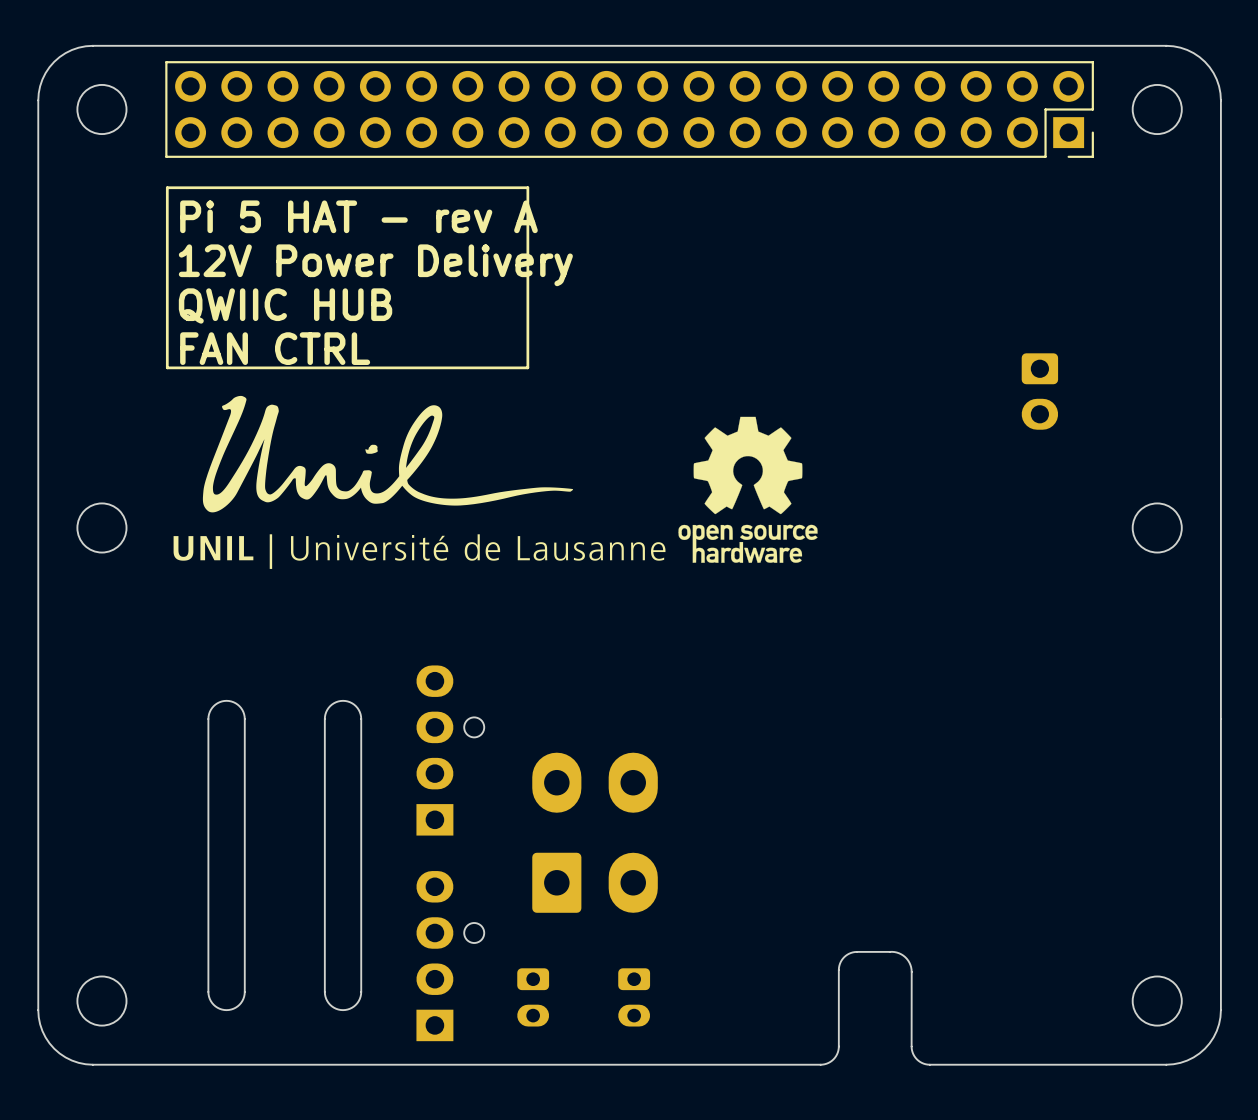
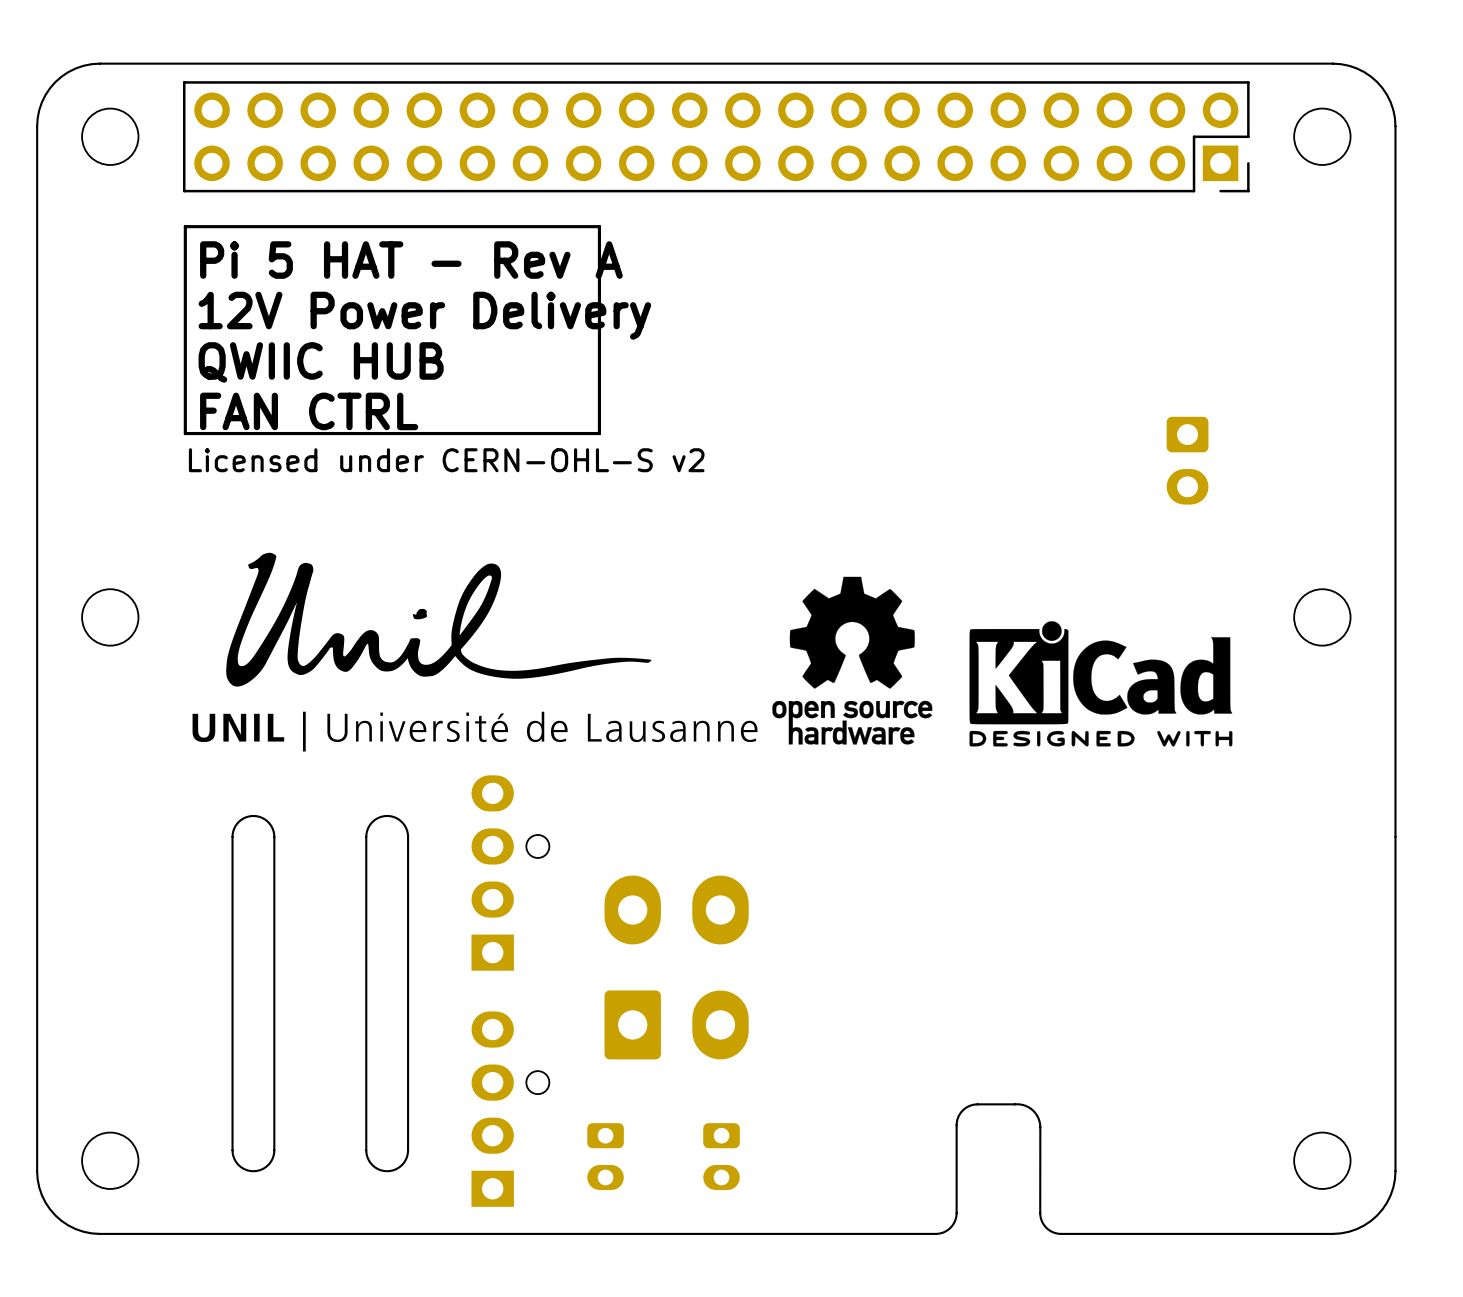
text: Pi 5 HAT - rev A (358, 216) -> Pi 5 HAT - Rev A (411, 260)
text: none -> Licensed under CERN-OHL-S v2 (446, 460)
drawing position: (371, 449) -> (419, 614)
drawing position: (387, 454) -> (438, 619)
drawing position: (748, 489) -> (852, 660)
drawing: none -> [969, 621, 1233, 747]
drawing: [337, 534, 340, 561] -> none
drawing: [412, 534, 449, 561] -> none
drawing position: (441, 538) -> (500, 716)
drawing: [362, 542, 378, 561] -> none
drawing: [485, 542, 501, 561] -> none
drawing: [533, 542, 548, 561] -> none
drawing: [589, 542, 604, 561] -> none
drawing position: (472, 547) -> (535, 726)
drawing position: (183, 548) -> (203, 727)
drawing position: (210, 548) -> (234, 727)
drawing position: (229, 548) -> (256, 727)
drawing position: (246, 548) -> (275, 727)
drawing position: (299, 548) -> (337, 727)
drawing position: (523, 548) -> (594, 727)
drawing position: (424, 549) -> (480, 728)
drawing position: (270, 551) -> (304, 731)
drawing position: (322, 551) -> (363, 731)
drawing position: (351, 551) -> (397, 731)
drawing position: (387, 551) -> (437, 731)
drawing position: (400, 551) -> (453, 731)
drawing position: (561, 551) -> (637, 731)
drawing position: (579, 551) -> (658, 731)
drawing position: (616, 551) -> (701, 731)
drawing position: (637, 551) -> (725, 731)
drawing position: (658, 551) -> (749, 731)
drawing: none -> [380, 712, 383, 742]
drawing: none -> [466, 712, 508, 743]
drawing: none -> [409, 720, 427, 743]
drawing: none -> [550, 720, 568, 743]
drawing: none -> [606, 720, 622, 743]
drawing: none -> [670, 720, 686, 743]

